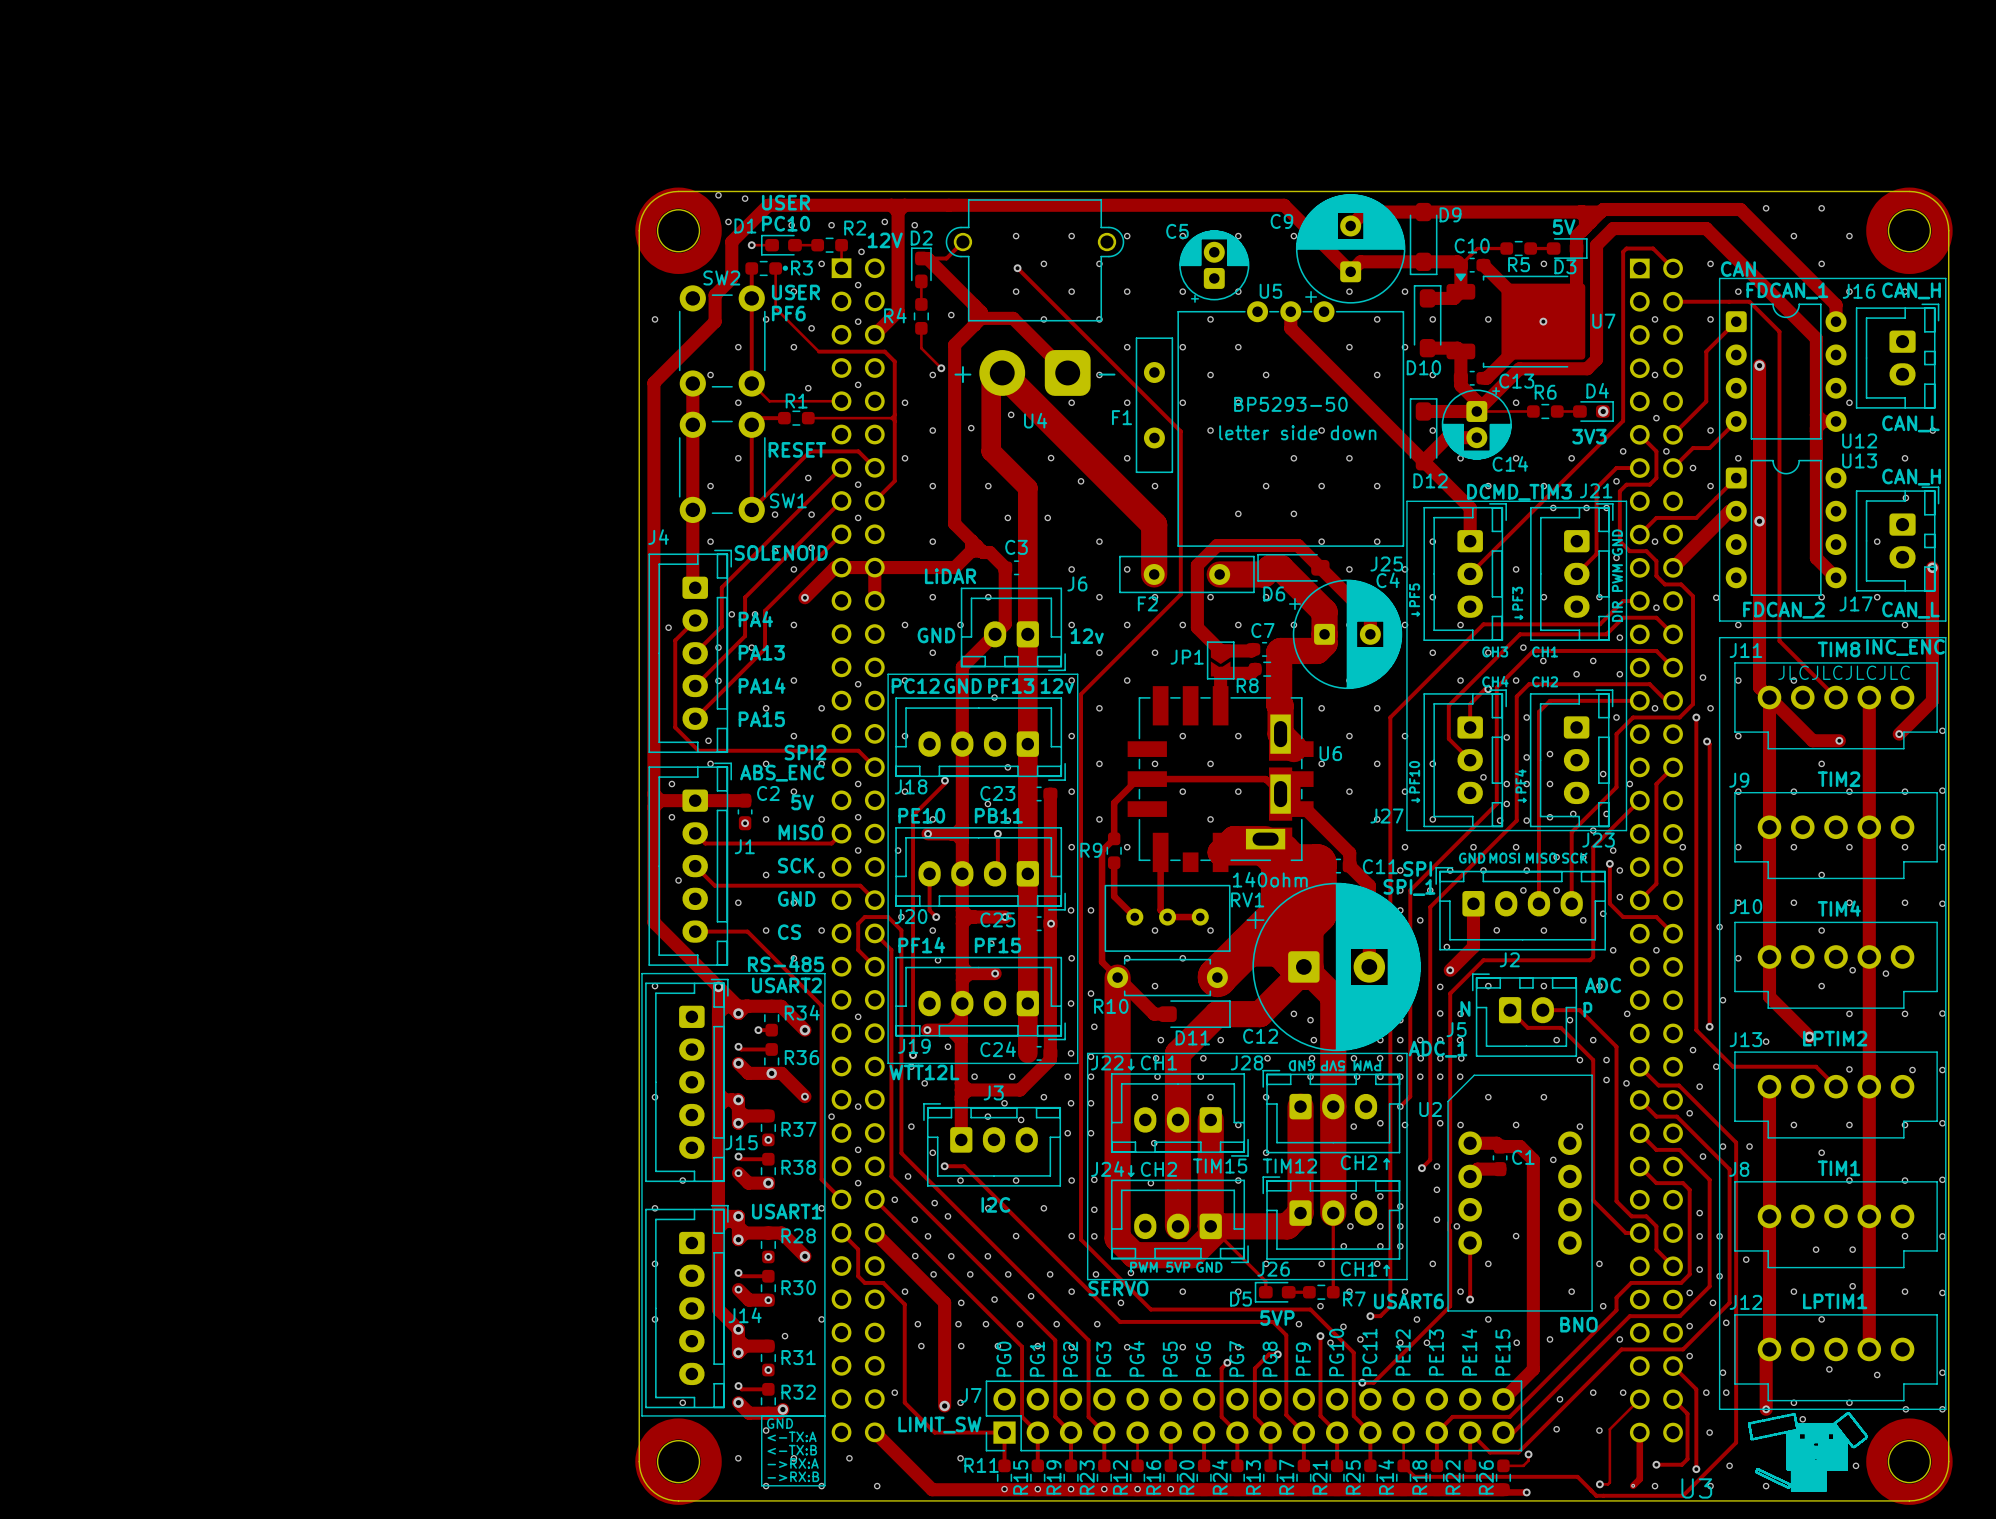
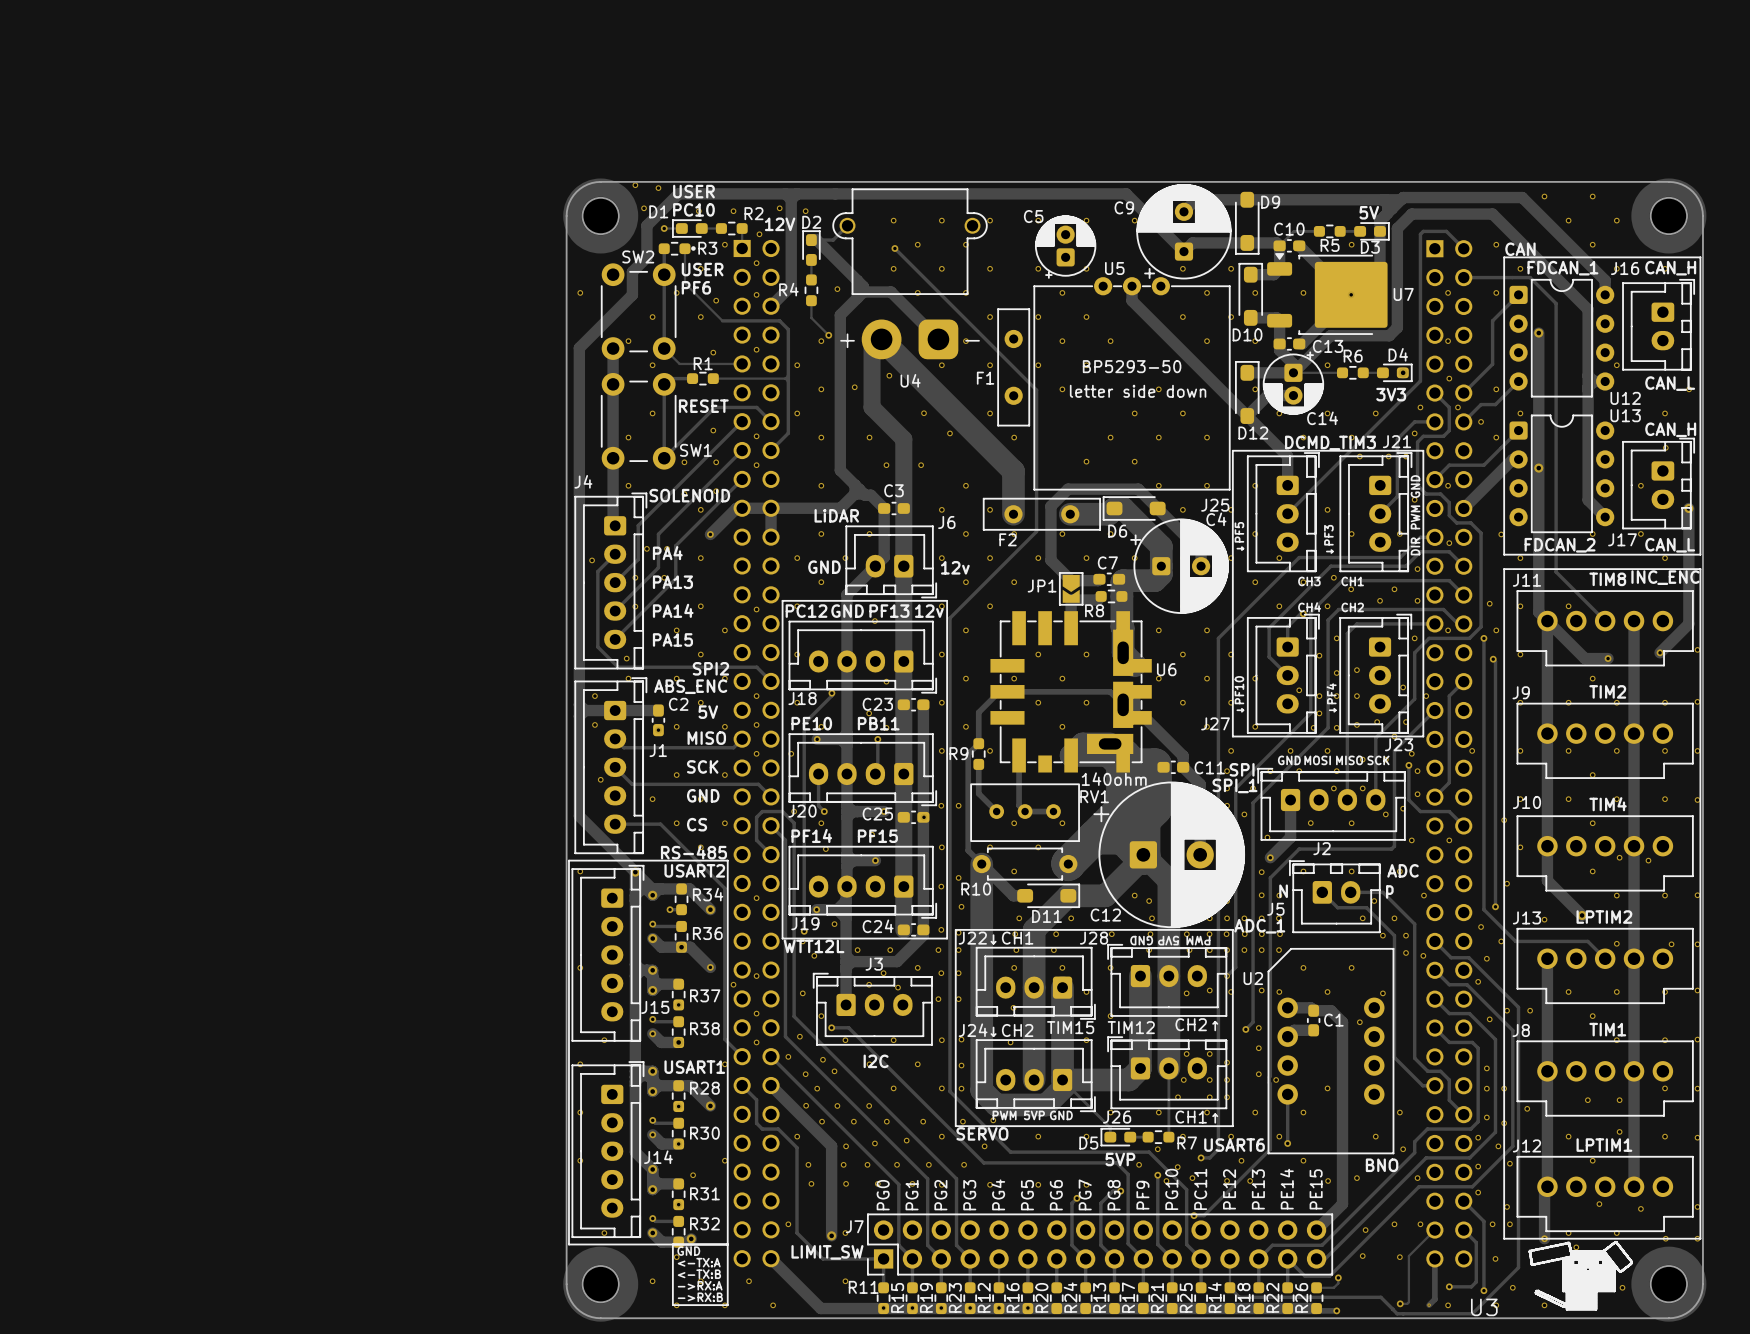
text: JLCJLCJLCJLC (1844, 672) -> none

